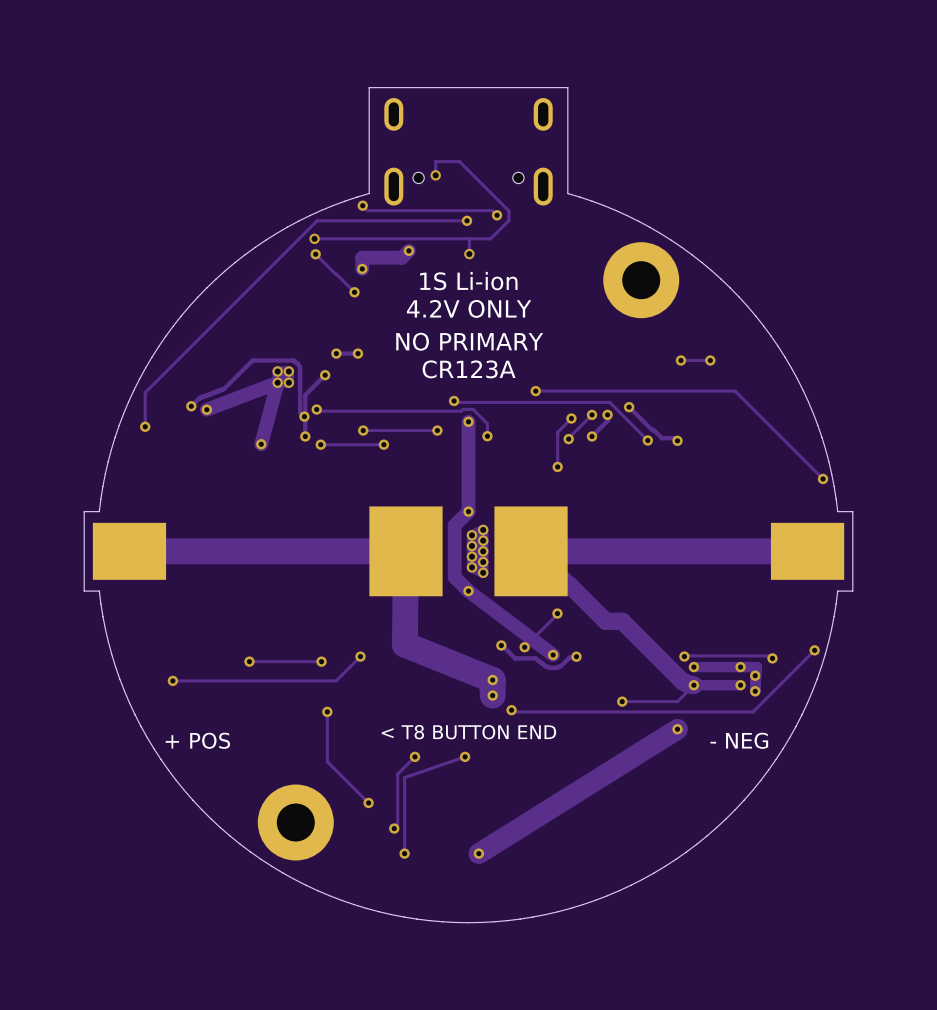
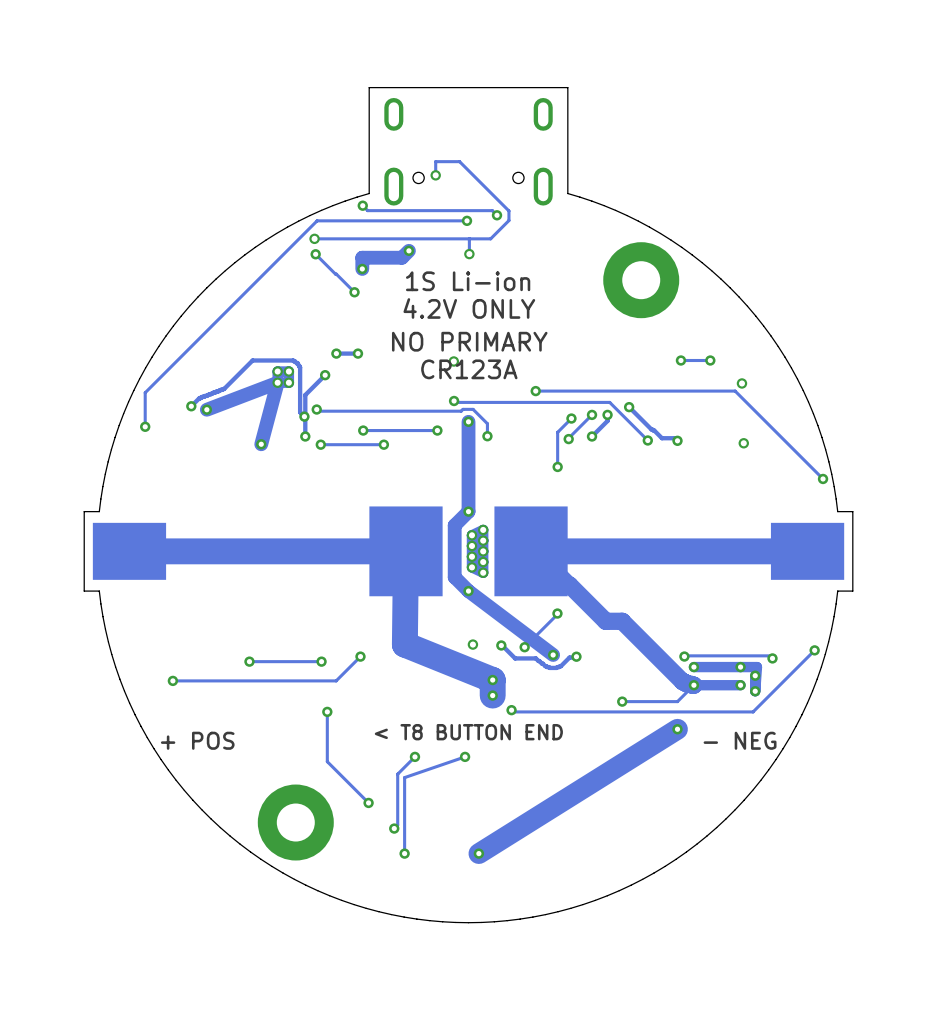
via: none -> (453, 361)
via: none -> (741, 383)
via: none -> (743, 443)
via: none -> (472, 644)

